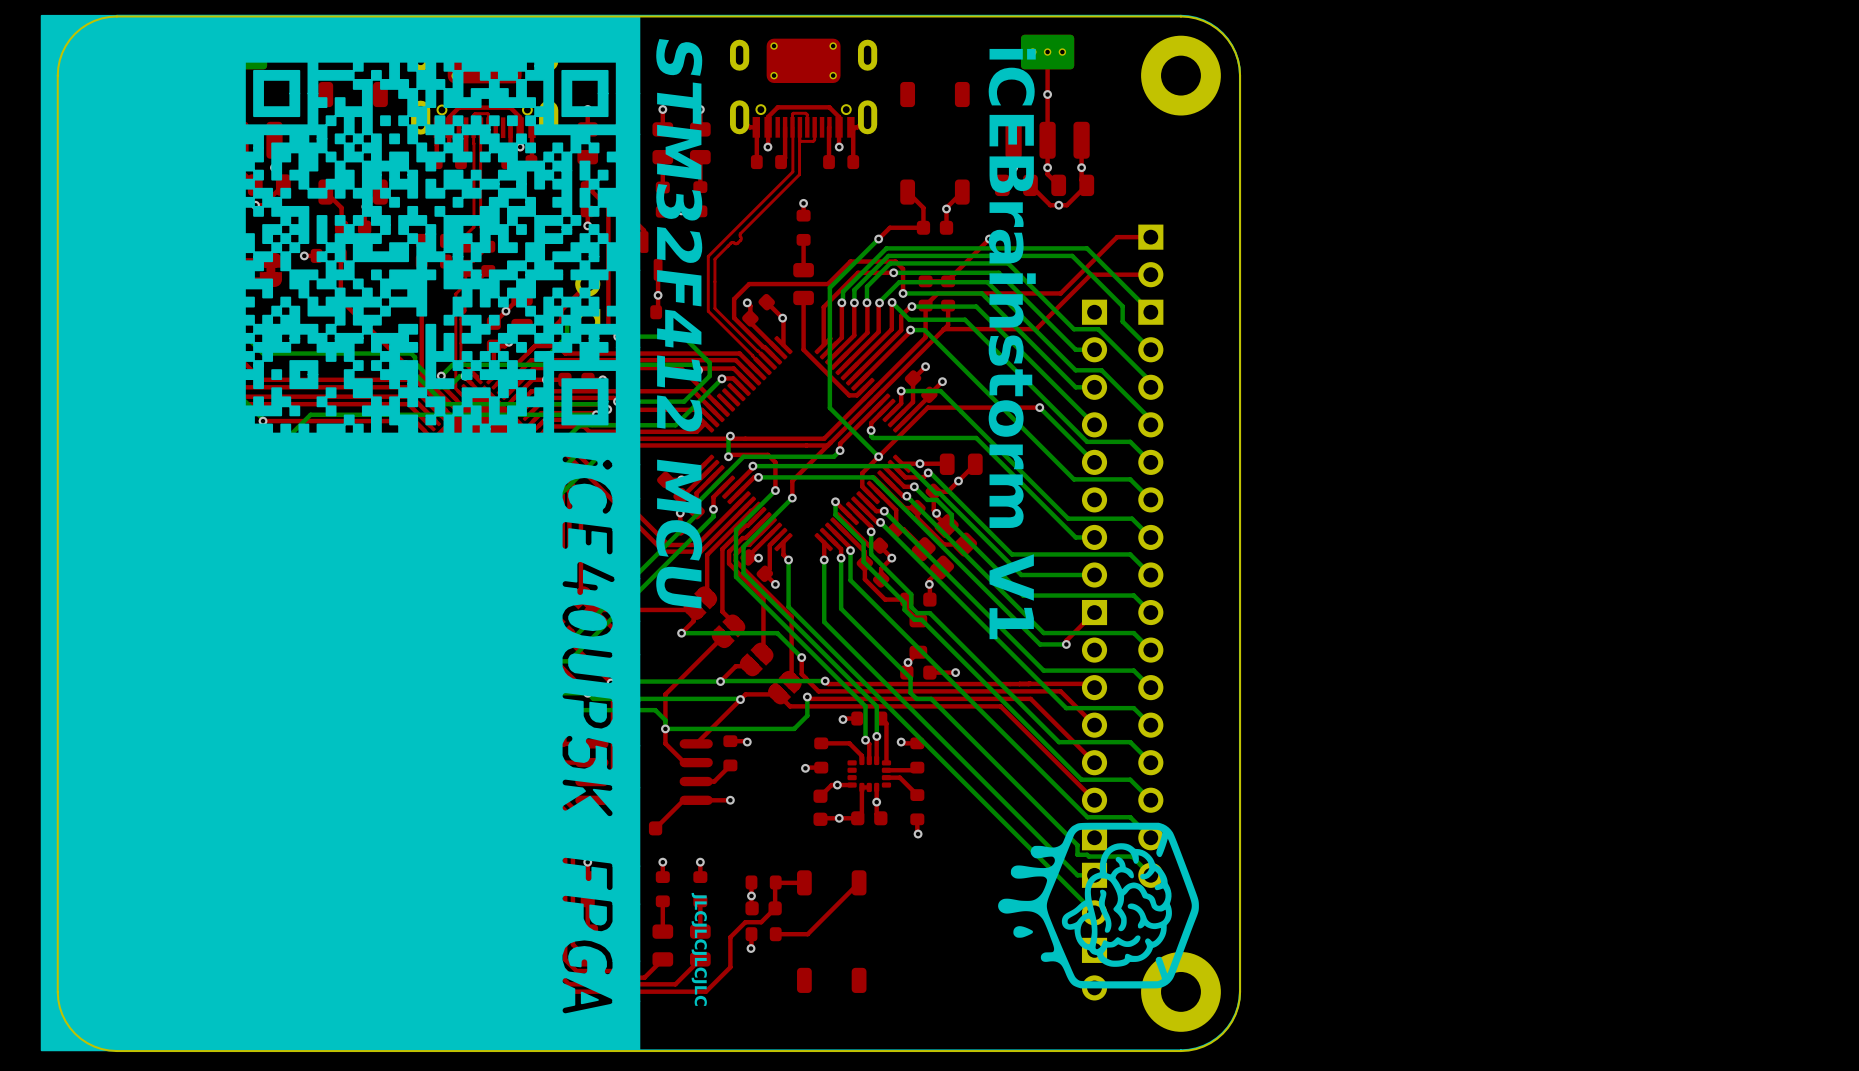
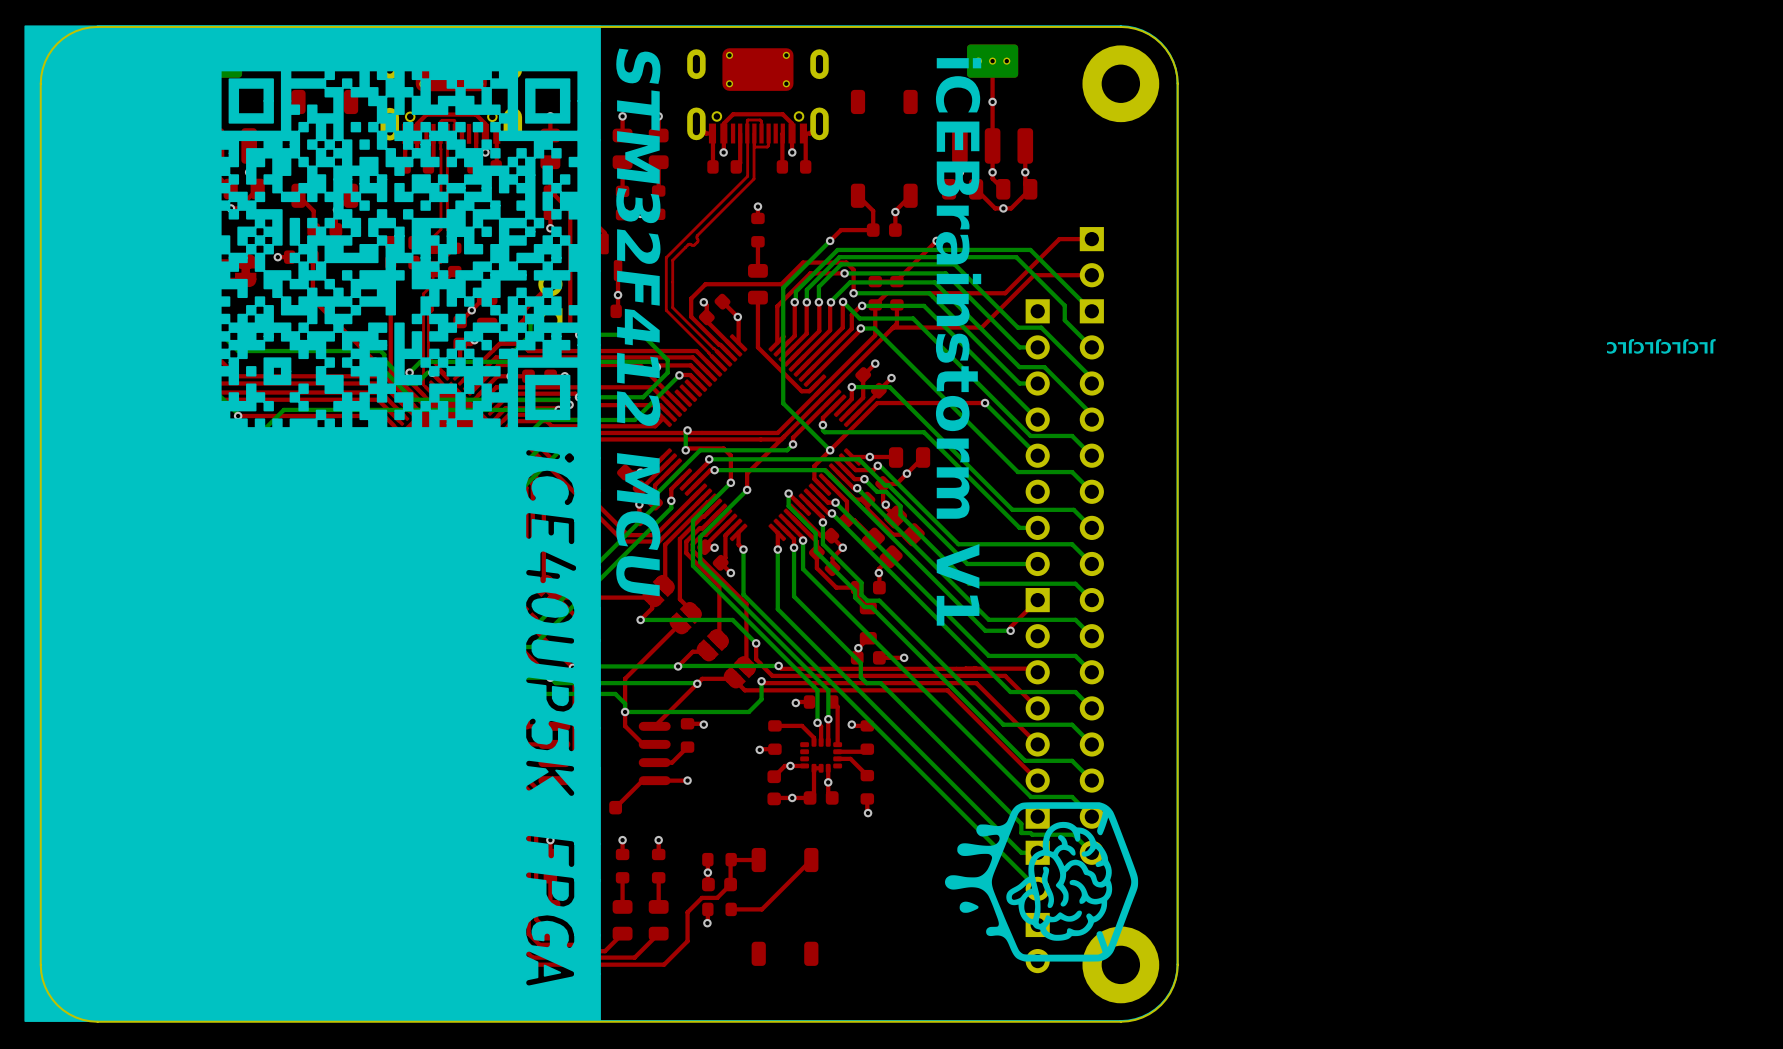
drawing: none -> [1607, 339, 1716, 354]
drawing: [691, 892, 707, 1006] -> none

